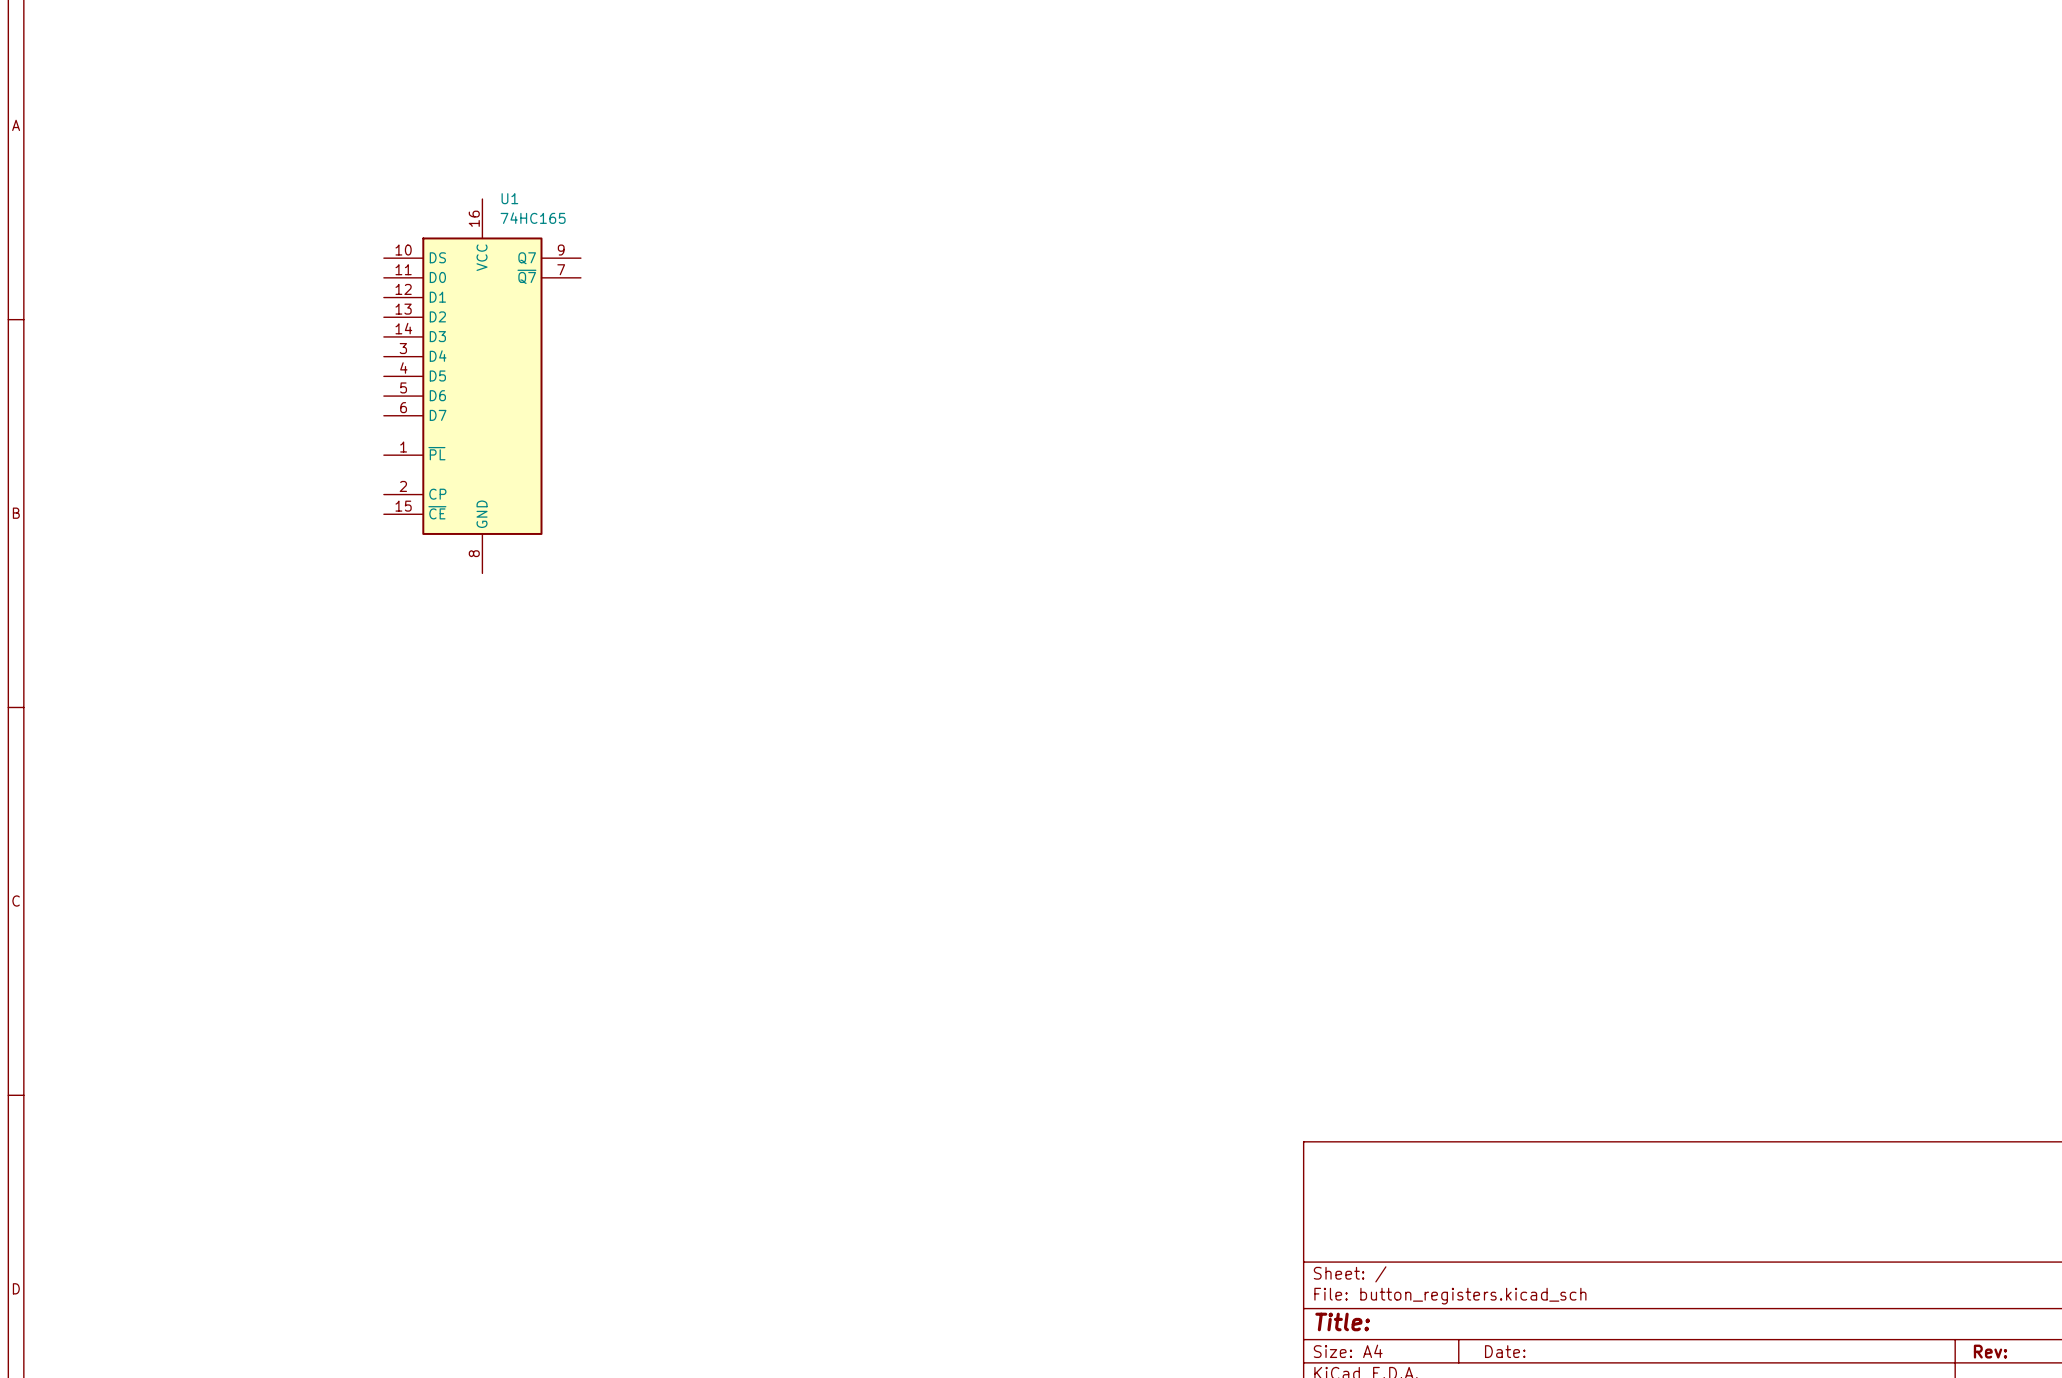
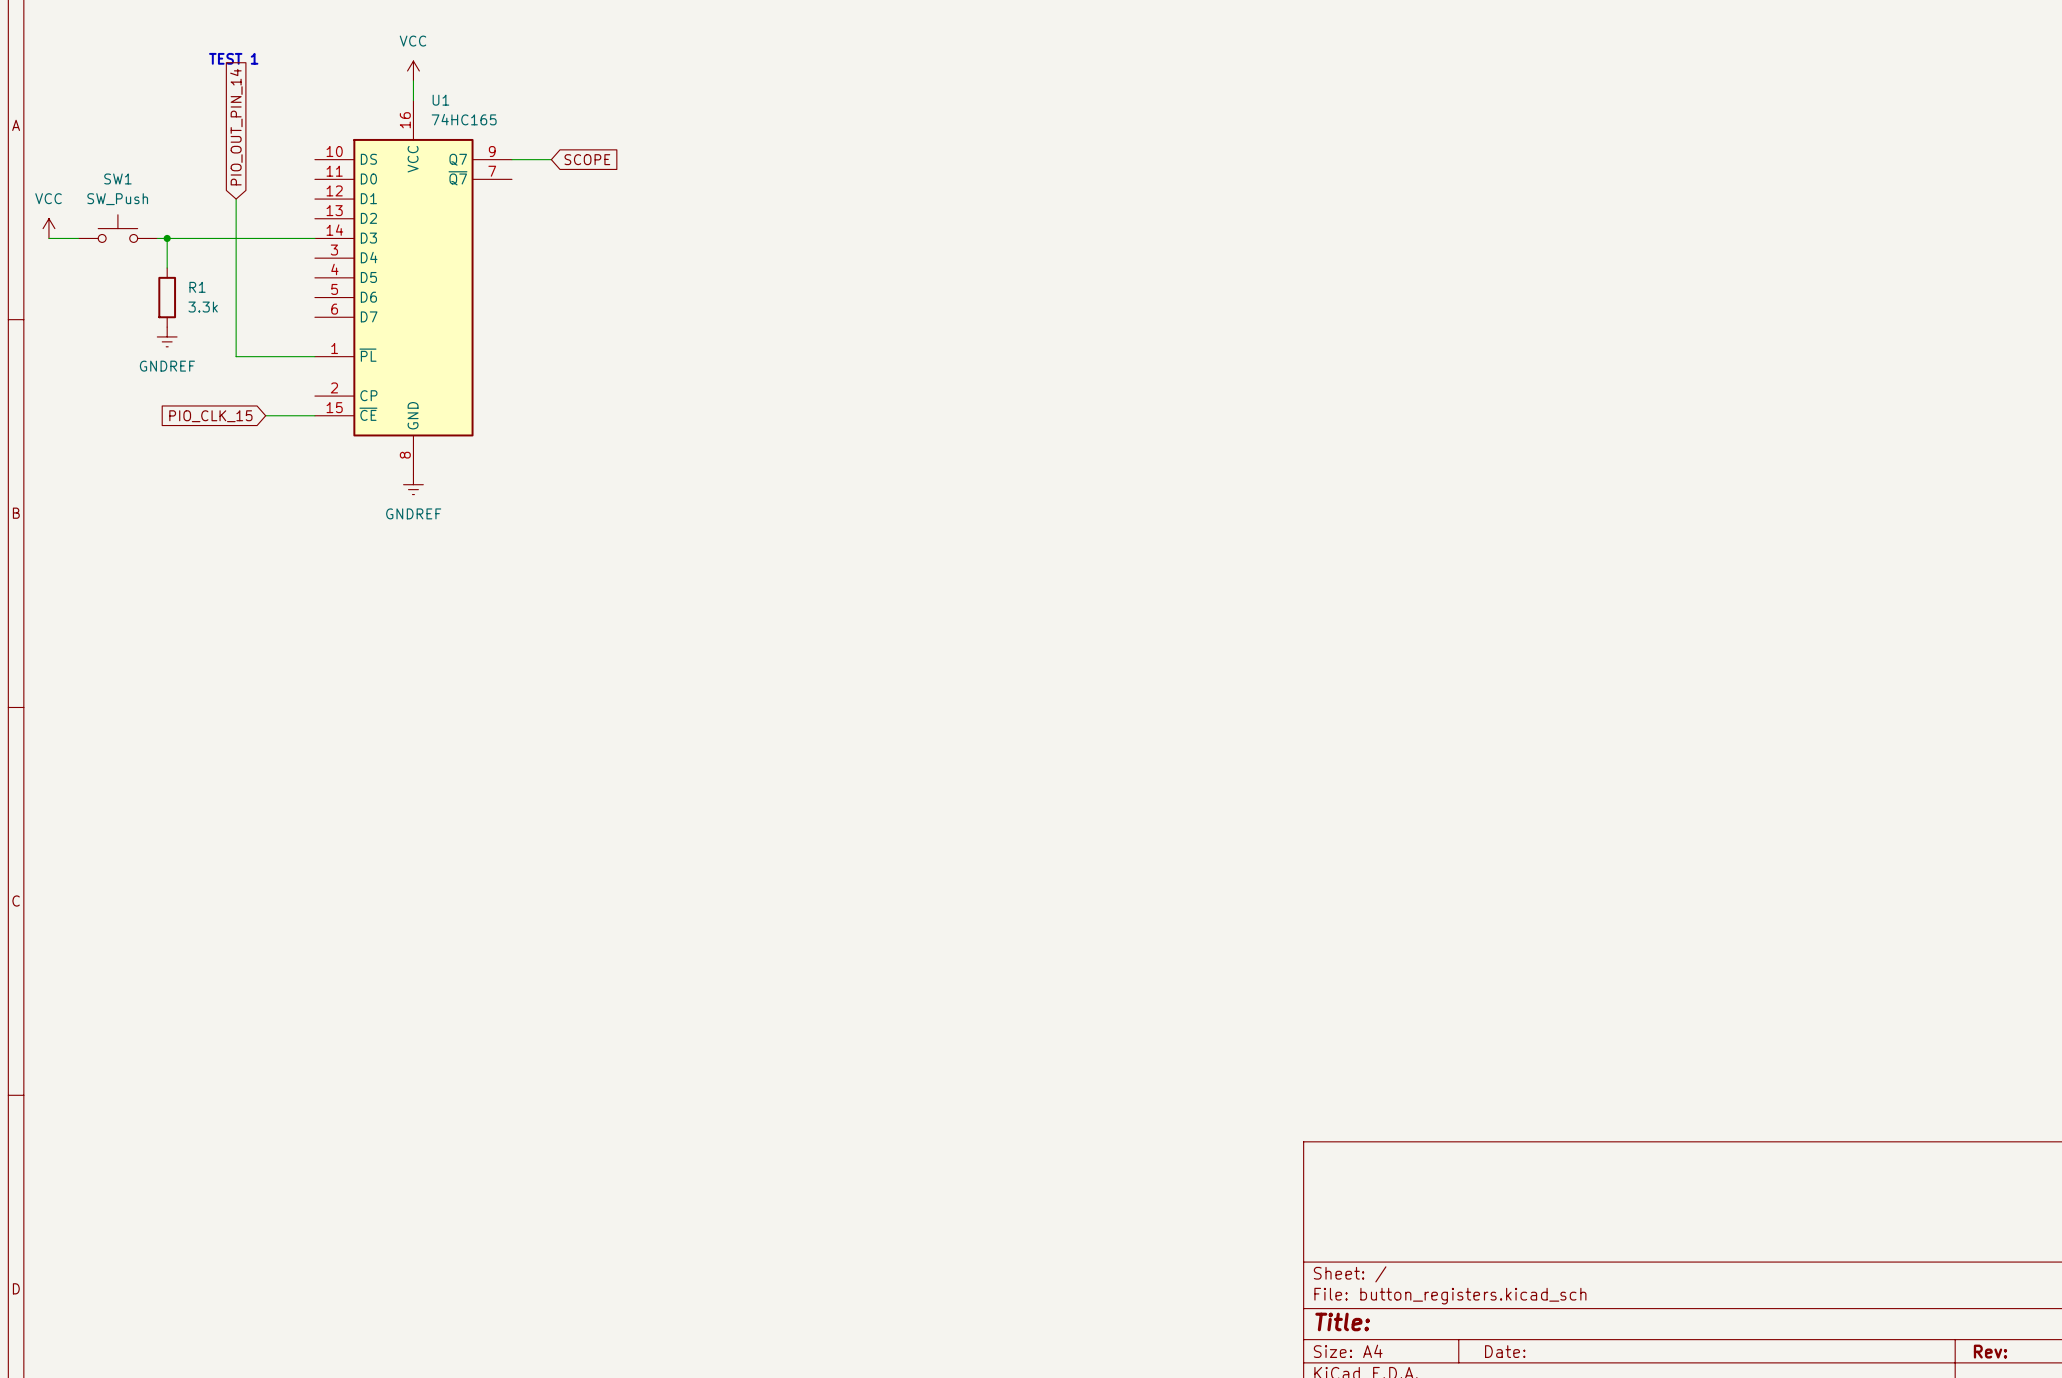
text: none -> TEST 1 (233, 58)
power symbol: none -> VCC (413, 70)
wire: none -> (413, 80) (413, 100)
global label: none -> PIO_OUT_PIN_14 (236, 127)
wire: none -> (511, 159) (551, 159)
global label: none -> SCOPE (587, 159)
wire: none -> (236, 199) (236, 356) (314, 356)
power symbol: none -> VCC (48, 228)
SW1: none -> SW_Push (117, 228)
wire: none -> (48, 238) (78, 238)
wire: none -> (157, 238) (314, 238)
wire: none -> (167, 238) (167, 268)
junction: none -> (167, 238)
R1: none -> 3.3k (167, 297)
power symbol: none -> GNDREF (167, 336)
U1 position: (482, 386) -> (413, 287)
wire: none -> (265, 415) (314, 415)
global label: none -> PIO_CLK_15 (210, 416)
power symbol: none -> GNDREF (413, 484)

